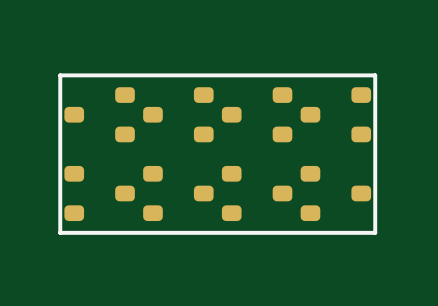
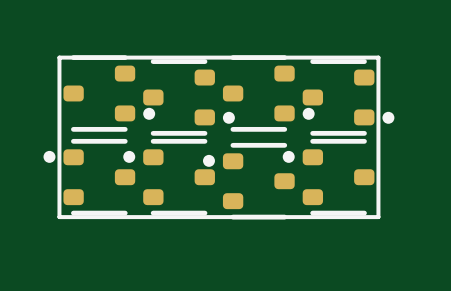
part footprint: [64, 87, 135, 143] -> [63, 55, 156, 132]
part footprint: [143, 87, 214, 143] -> [143, 59, 235, 136]
part footprint: [221, 87, 293, 143] -> [222, 55, 315, 132]
part footprint: [300, 87, 372, 143] -> [302, 59, 395, 136]
part footprint: [64, 165, 135, 222] -> [43, 138, 136, 216]
part footprint: [143, 165, 214, 222] -> [123, 138, 215, 216]
part footprint: [221, 165, 293, 222] -> [203, 142, 295, 220]
part footprint: [300, 165, 372, 222] -> [282, 138, 375, 216]

